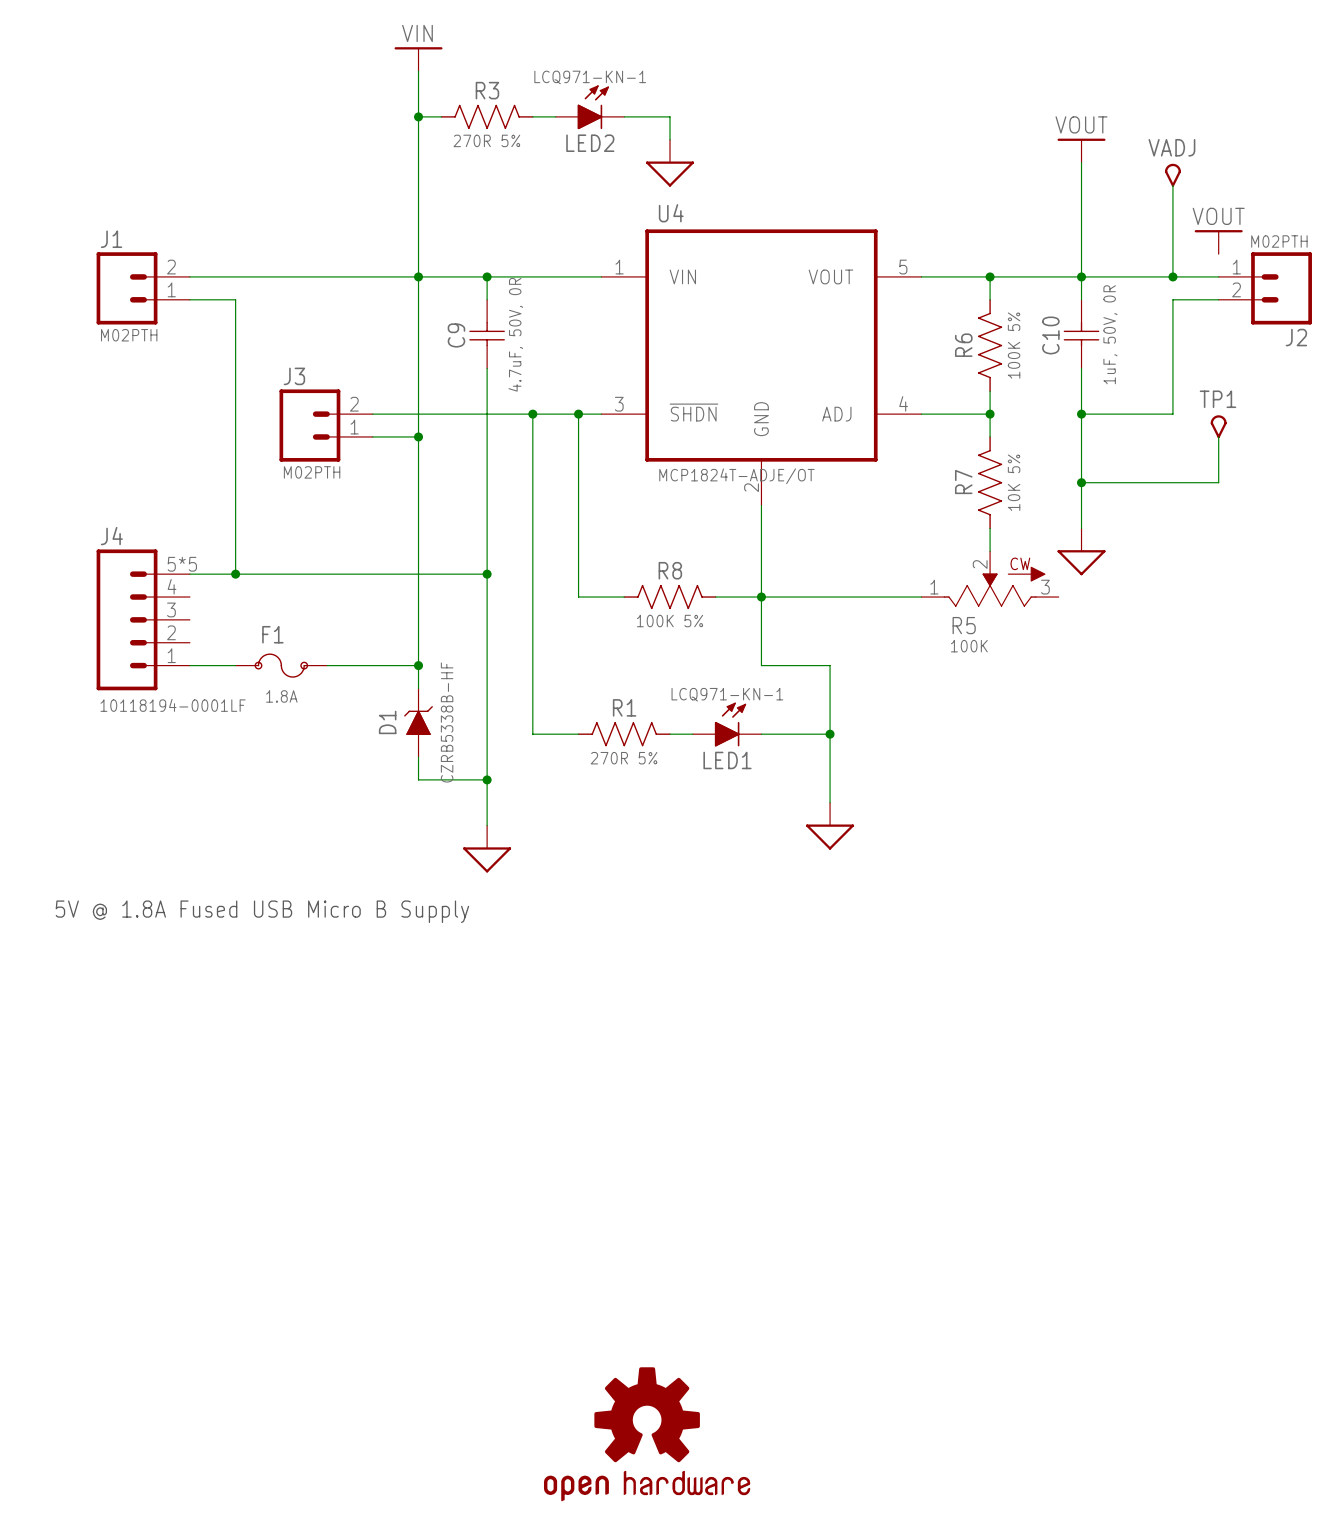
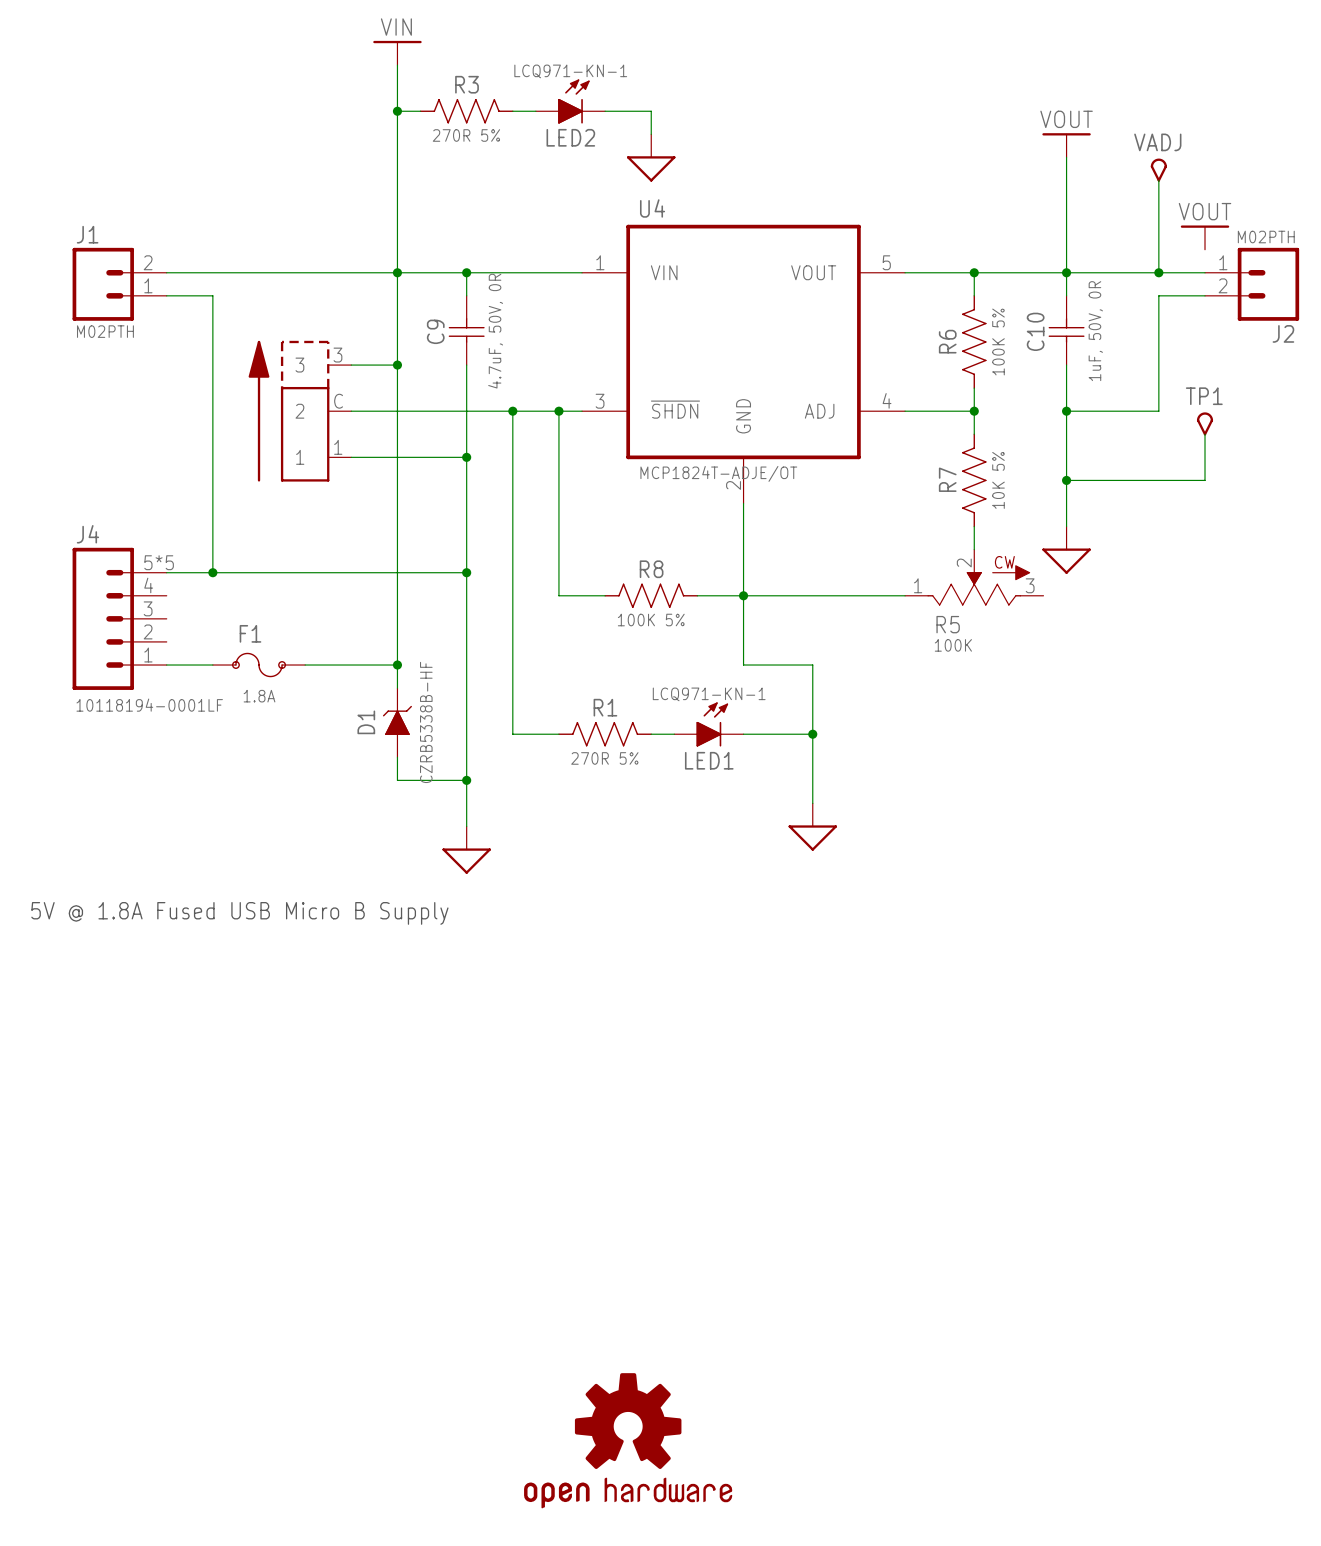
junction: none -> (397, 365)
part: none -> (299, 411)
J3: M02PTH (326, 425) -> none
wire: (372, 436) (418, 436) -> (351, 365) (397, 365)
junction: (418, 436) -> none
wire: none -> (351, 457) (466, 457)
junction: none -> (466, 457)

